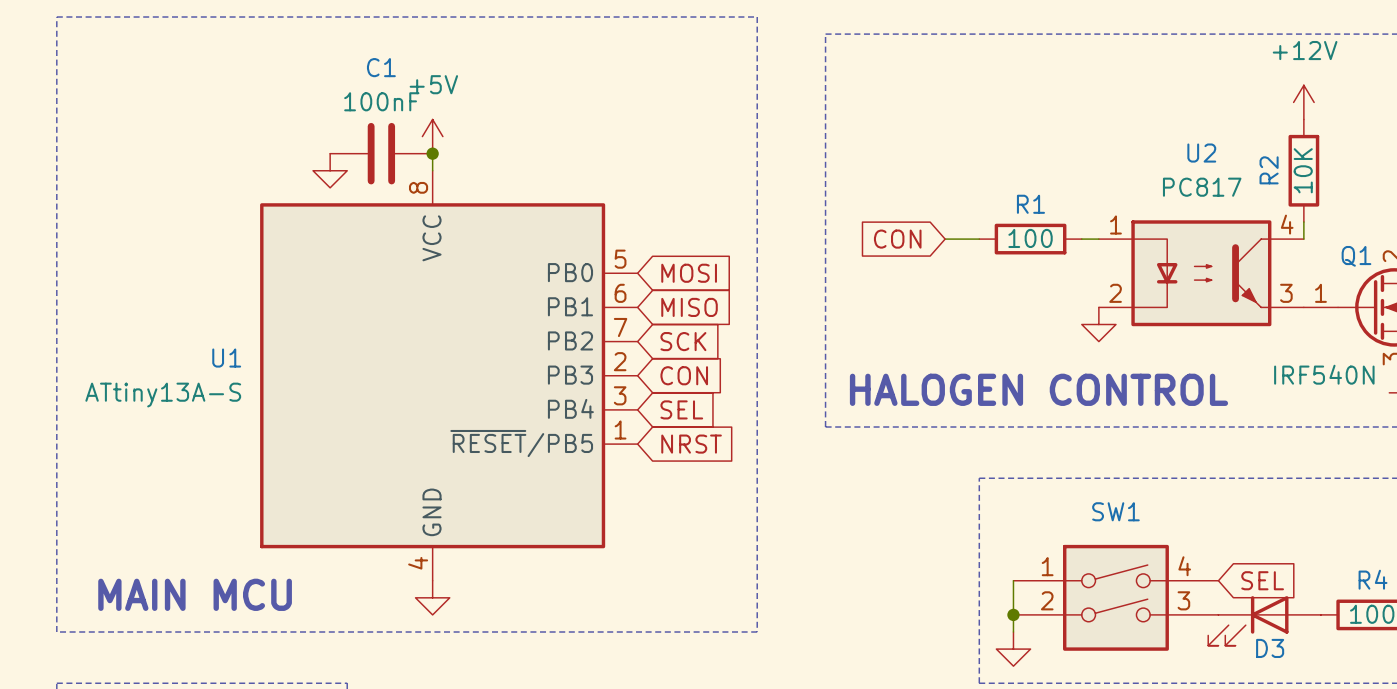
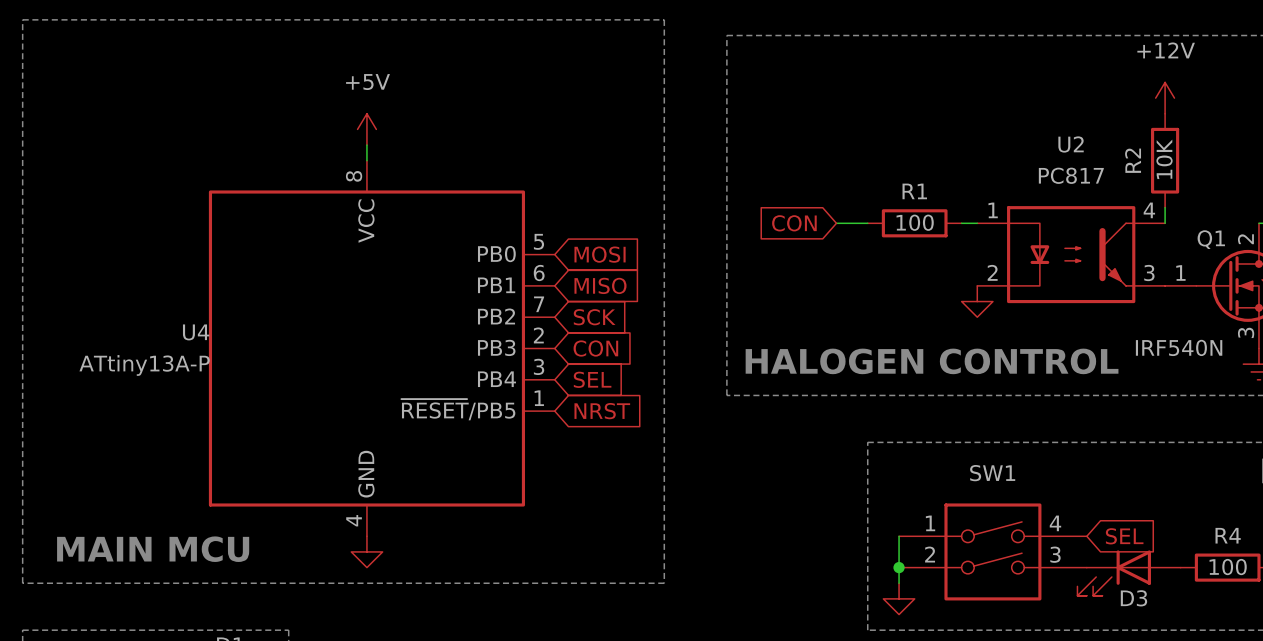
C1: 100nF (381, 153) -> none
junction: (432, 153) -> none
power symbol: (330, 170) -> none
U1 name: U1 (226, 358) -> U4 (196, 332)
U1 value: ATtiny13A-S (163, 395) -> ATtiny13A-P (144, 365)

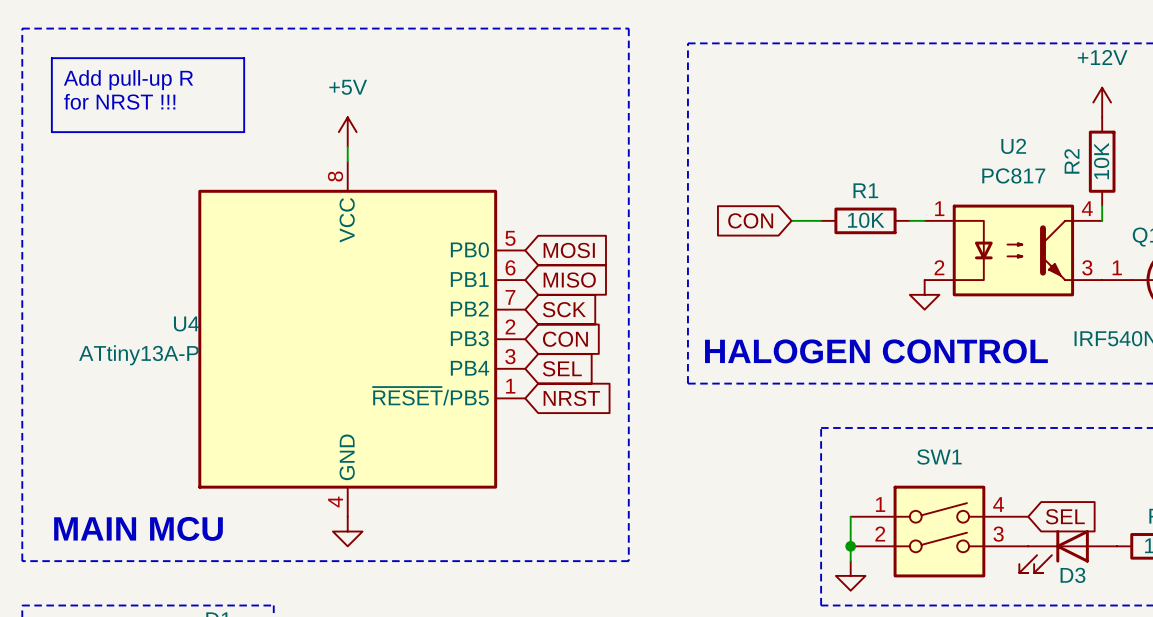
line: none -> (51, 58) (244, 58) (244, 132) (51, 132) (51, 58)
text: none -> Add pull-up R (128, 80)
text: none -> for NRST !!! (119, 101)
R1 value: 100 (915, 222) -> 10K (866, 220)

